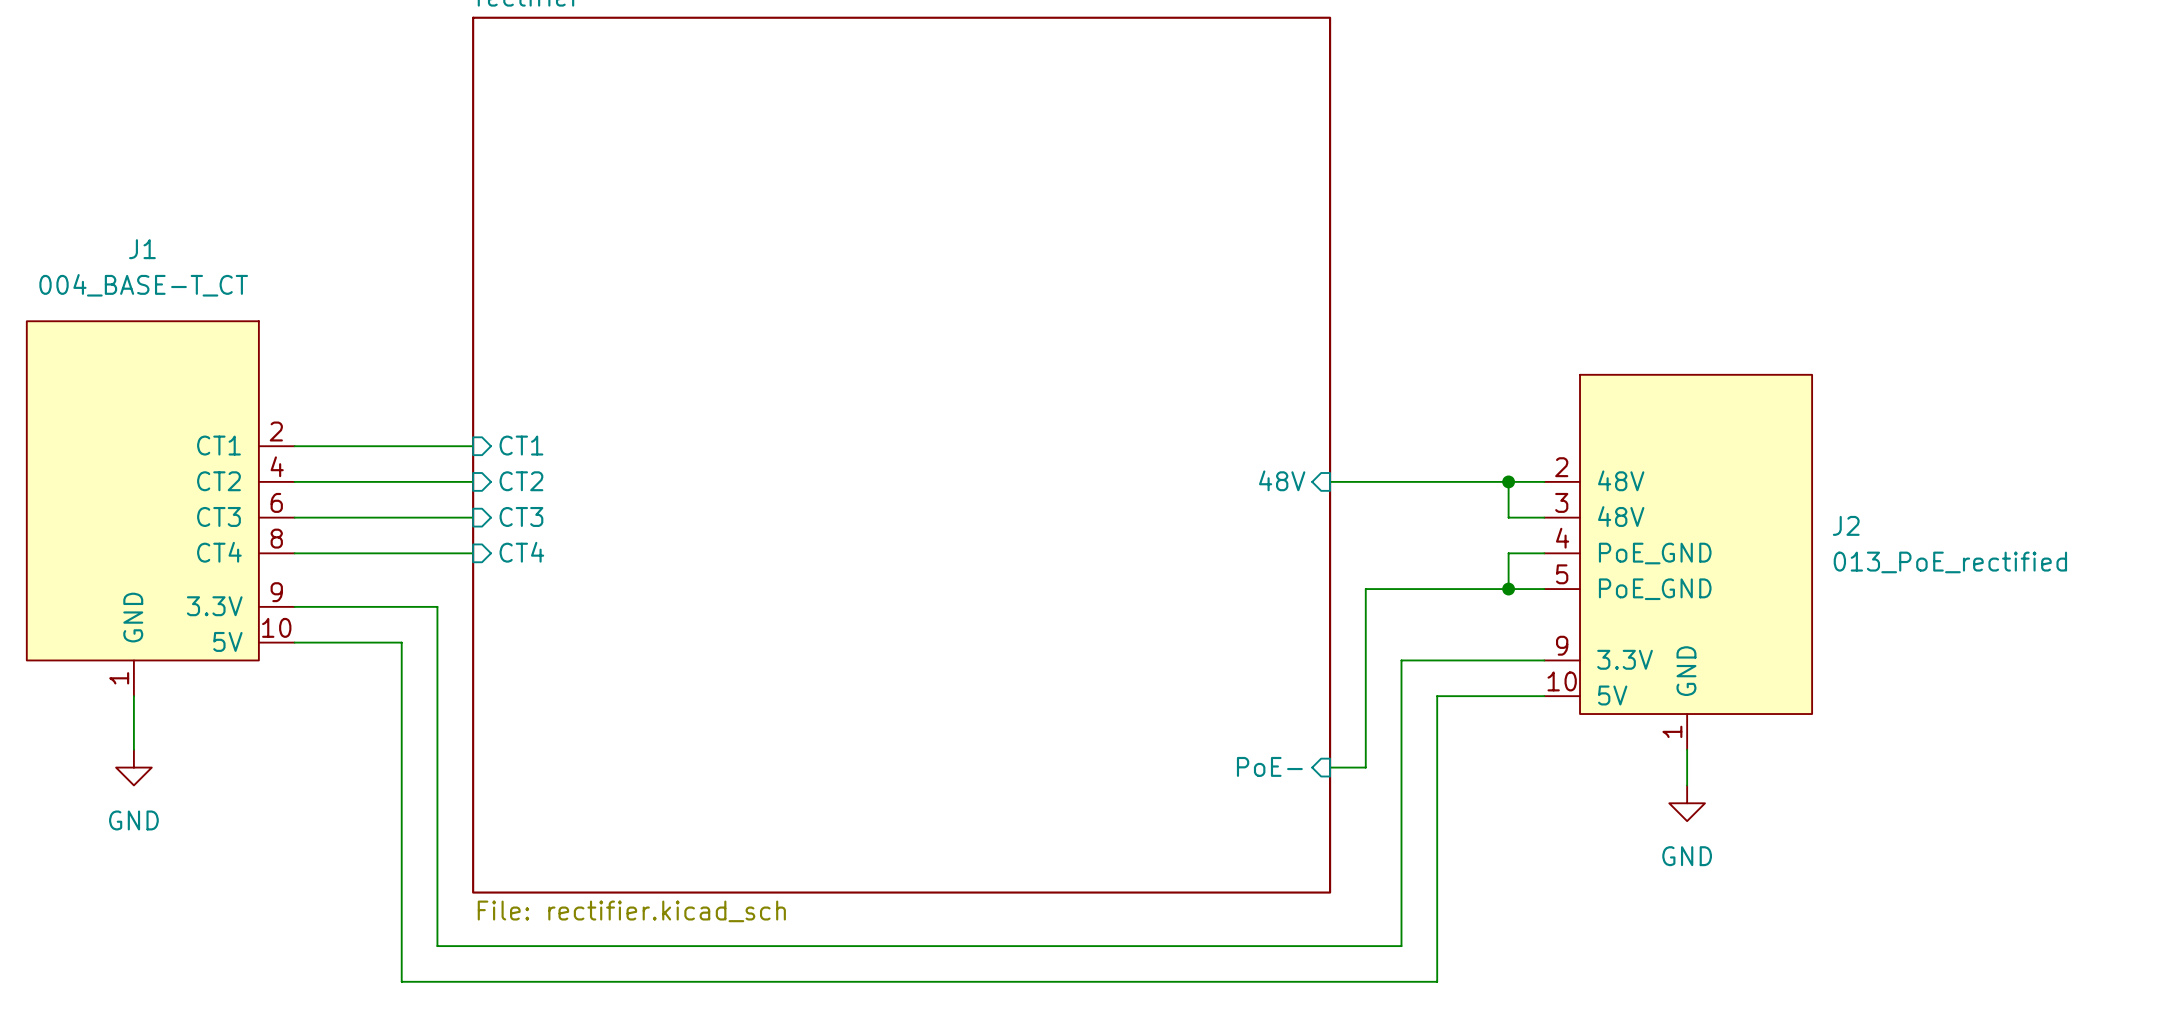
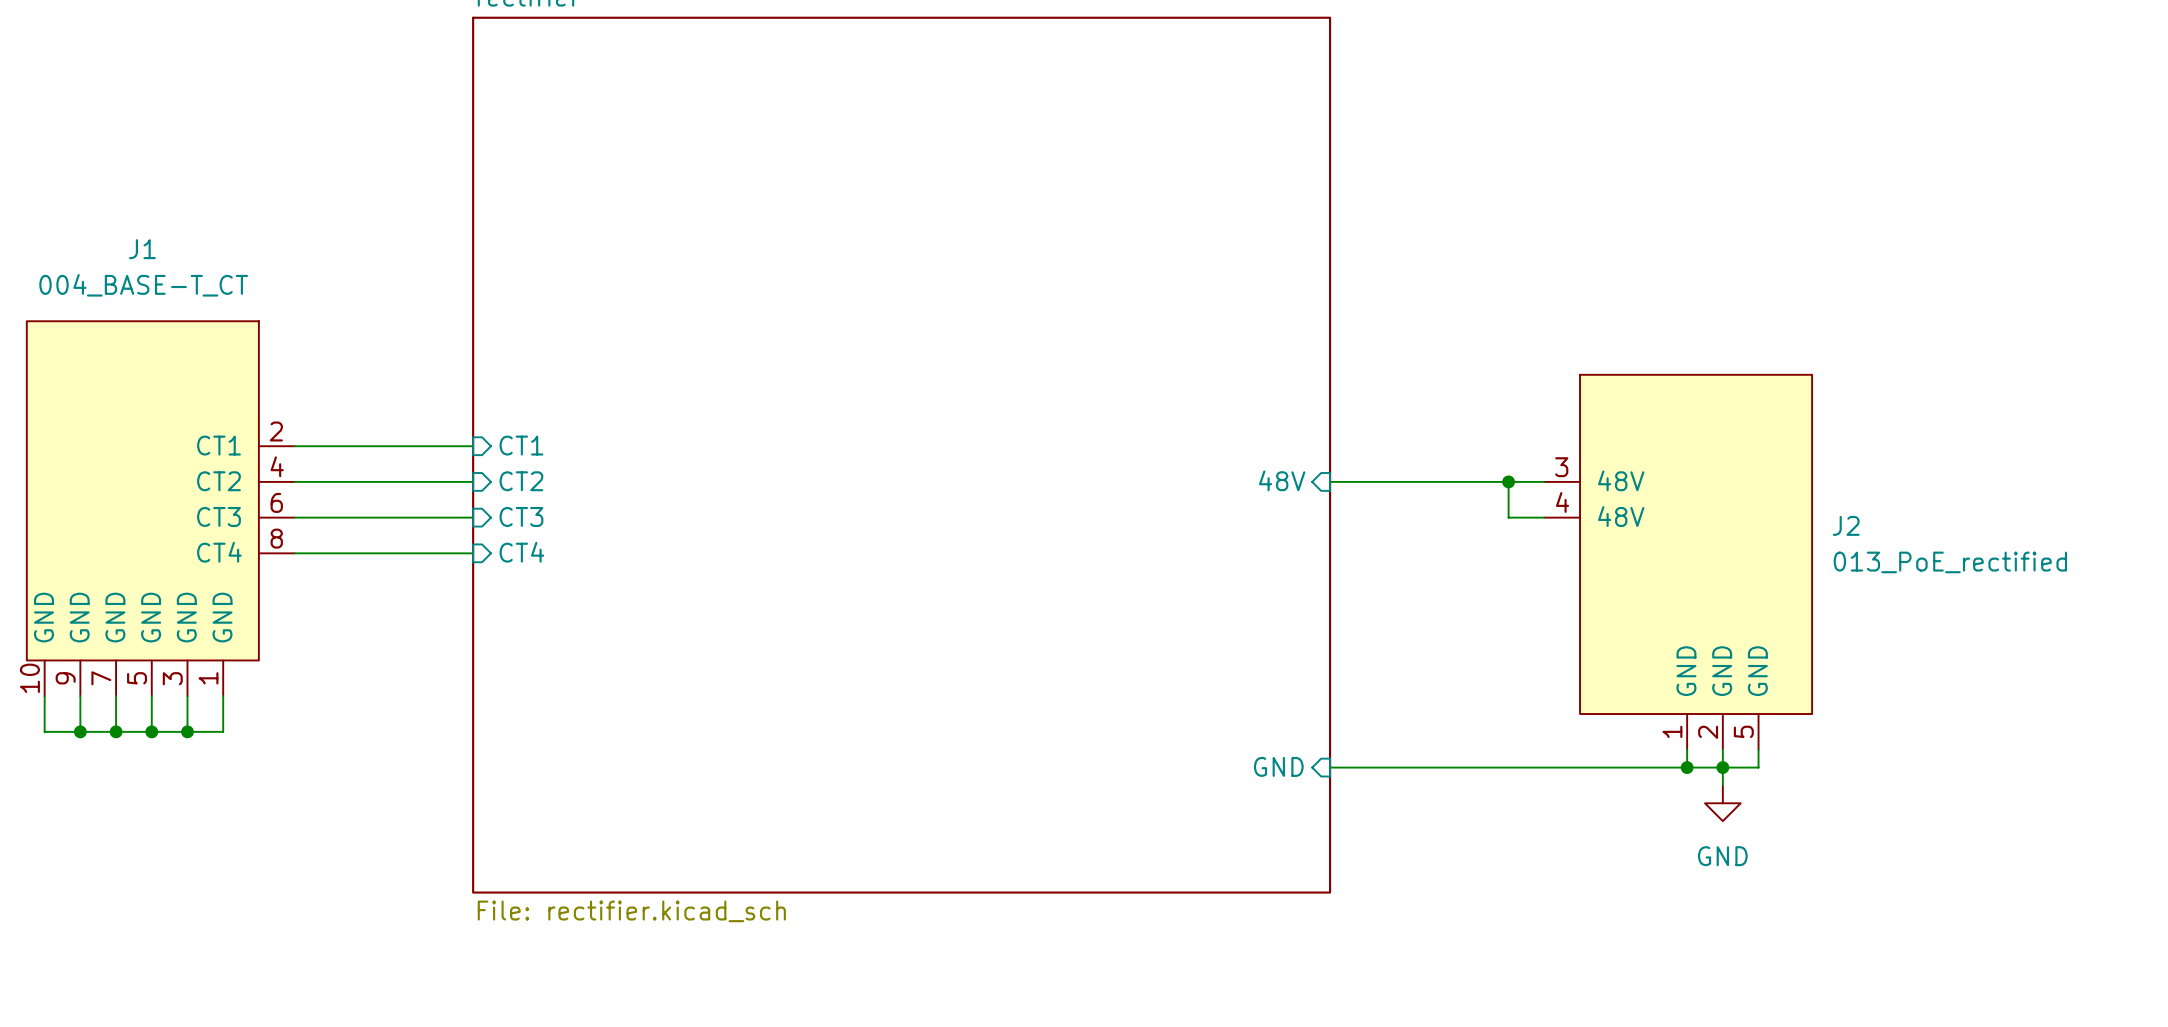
J1 symbol: [26, 321, 295, 697] -> [26, 321, 295, 697]
J2 symbol: [1544, 374, 1813, 750] -> [1544, 374, 1813, 750]
wire: (1544, 553) (1508, 553) (1508, 589) -> none
junction: (1508, 589) -> none
wire: (1544, 589) (1365, 589) (1365, 767) -> (1758, 749) (1758, 767) (1365, 767)
wire: (294, 606) (437, 606) (437, 946) (1401, 946) (1401, 660) (1544, 660) -> none
wire: (294, 642) (401, 642) (401, 981) (1437, 981) (1437, 696) (1544, 696) -> none
wire: none -> (44, 696) (44, 731) (223, 731) (223, 696)
wire: none -> (80, 696) (80, 731)
wire: none -> (116, 696) (116, 731)
wire: (133, 696) (133, 749) -> none
wire: none -> (151, 696) (151, 731)
wire: none -> (187, 696) (187, 731)
junction: none -> (80, 731)
junction: none -> (116, 731)
junction: none -> (151, 731)
junction: none -> (187, 731)
wire: none -> (1722, 749) (1722, 785)
sheet pin: PoE- (1269, 766) -> GND (1278, 766)
power symbol: GND (133, 767) -> none
wire: (1687, 767) (1687, 785) -> none
junction: none -> (1687, 767)
junction: none -> (1722, 767)
power symbol position: GND (1687, 803) -> GND (1722, 803)

